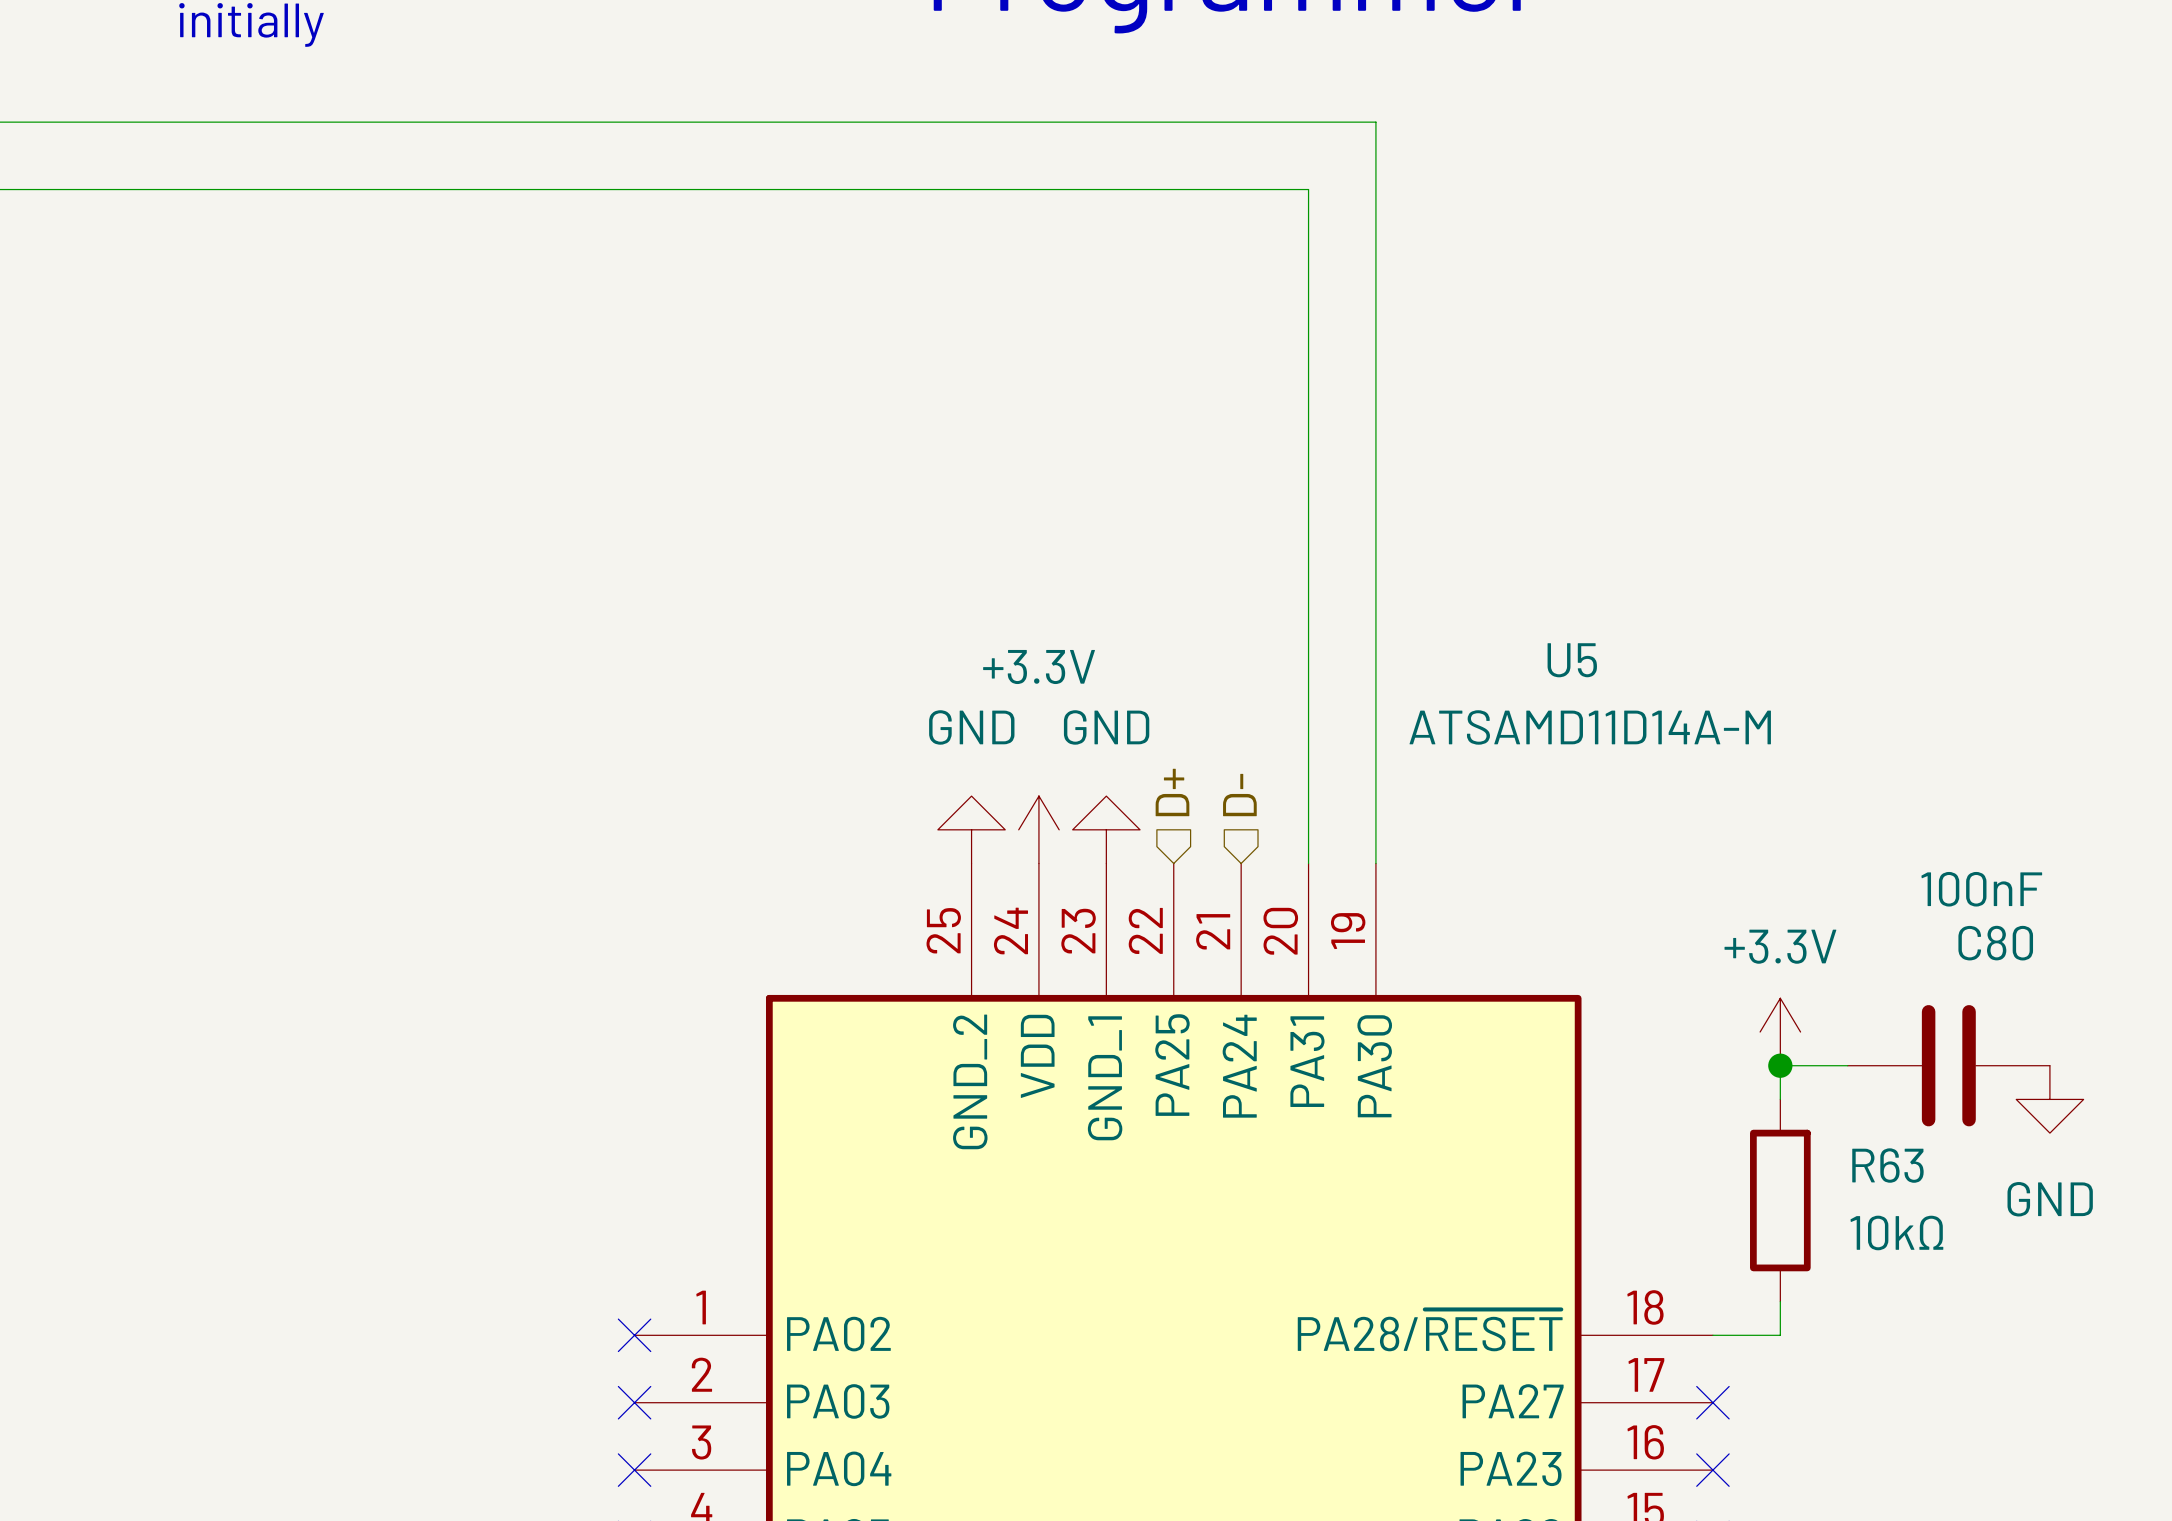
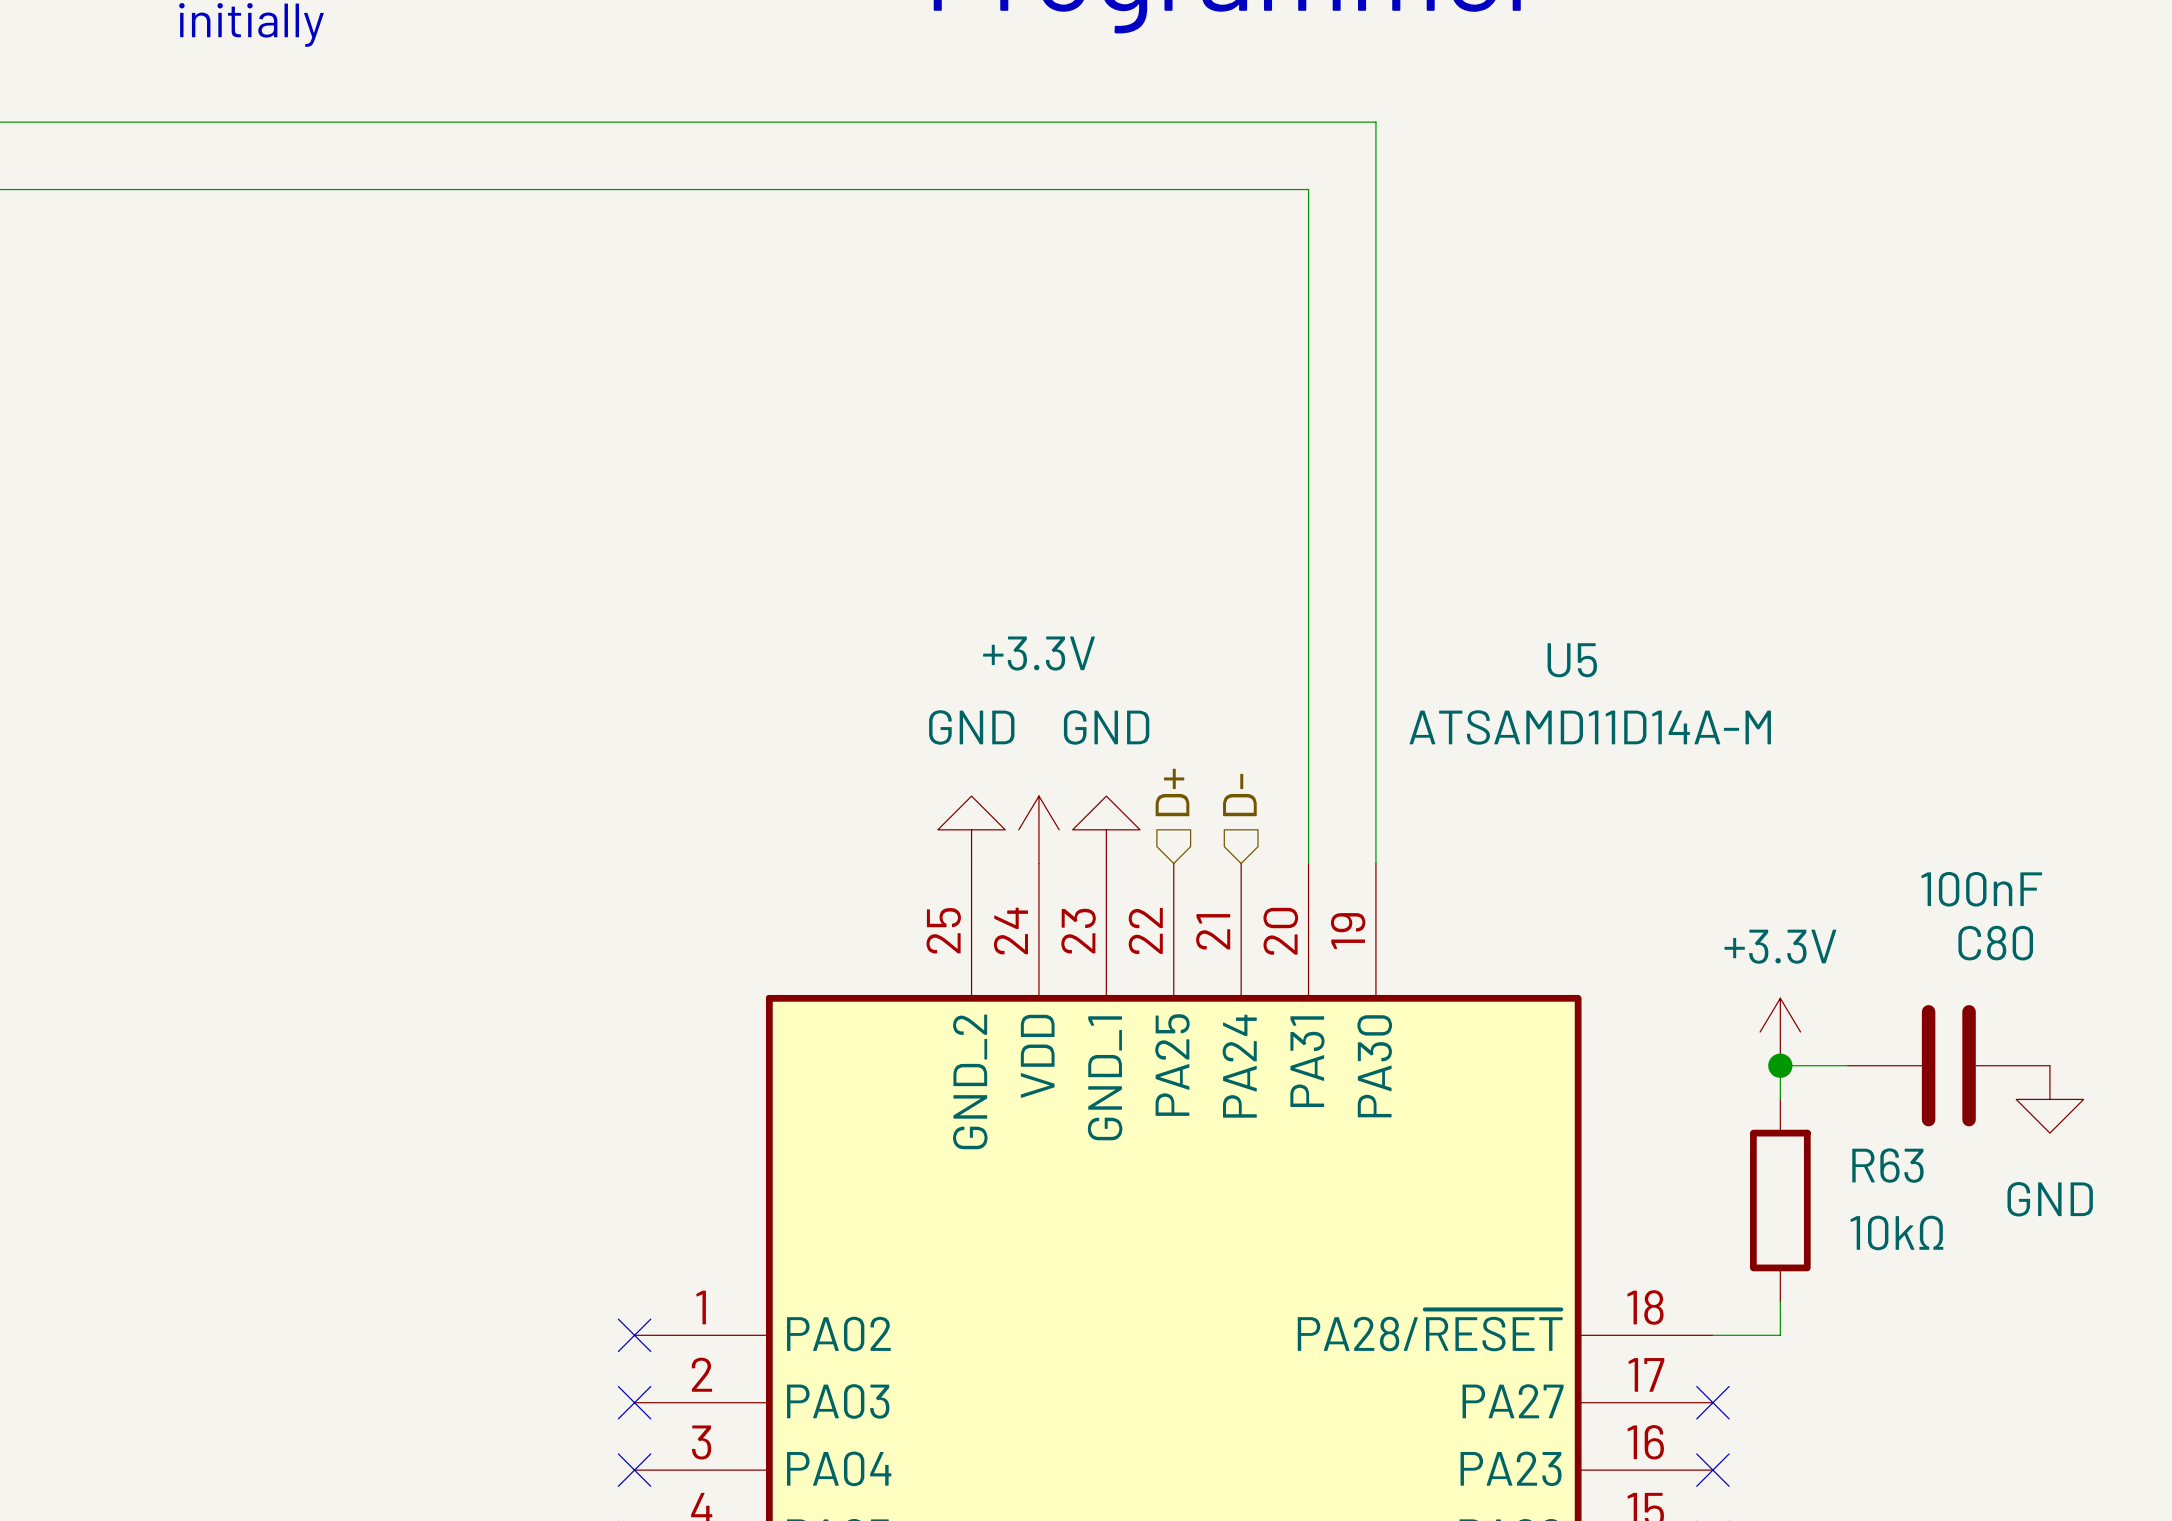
power symbol text position: +3.3V (1039, 667) -> +3.3V (1039, 653)

